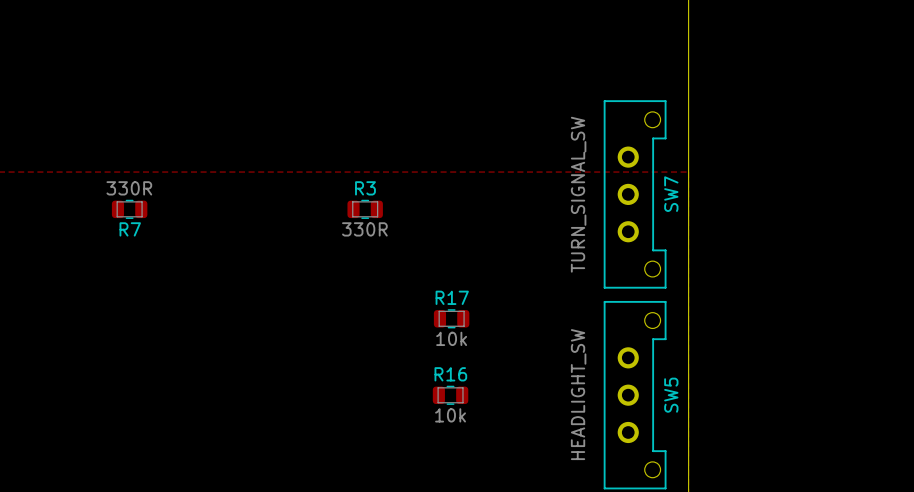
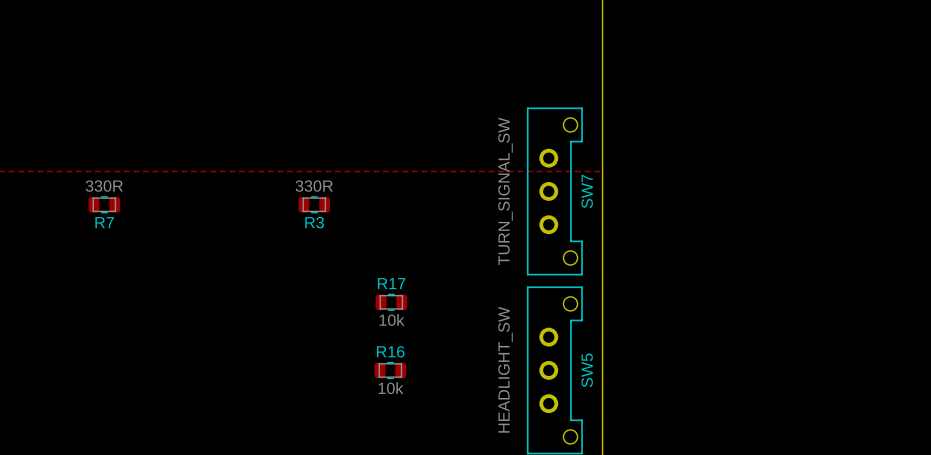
R3 name position: R3 (365, 188) -> R3 (314, 222)
R3 value position: 330R (364, 229) -> 330R (314, 186)

